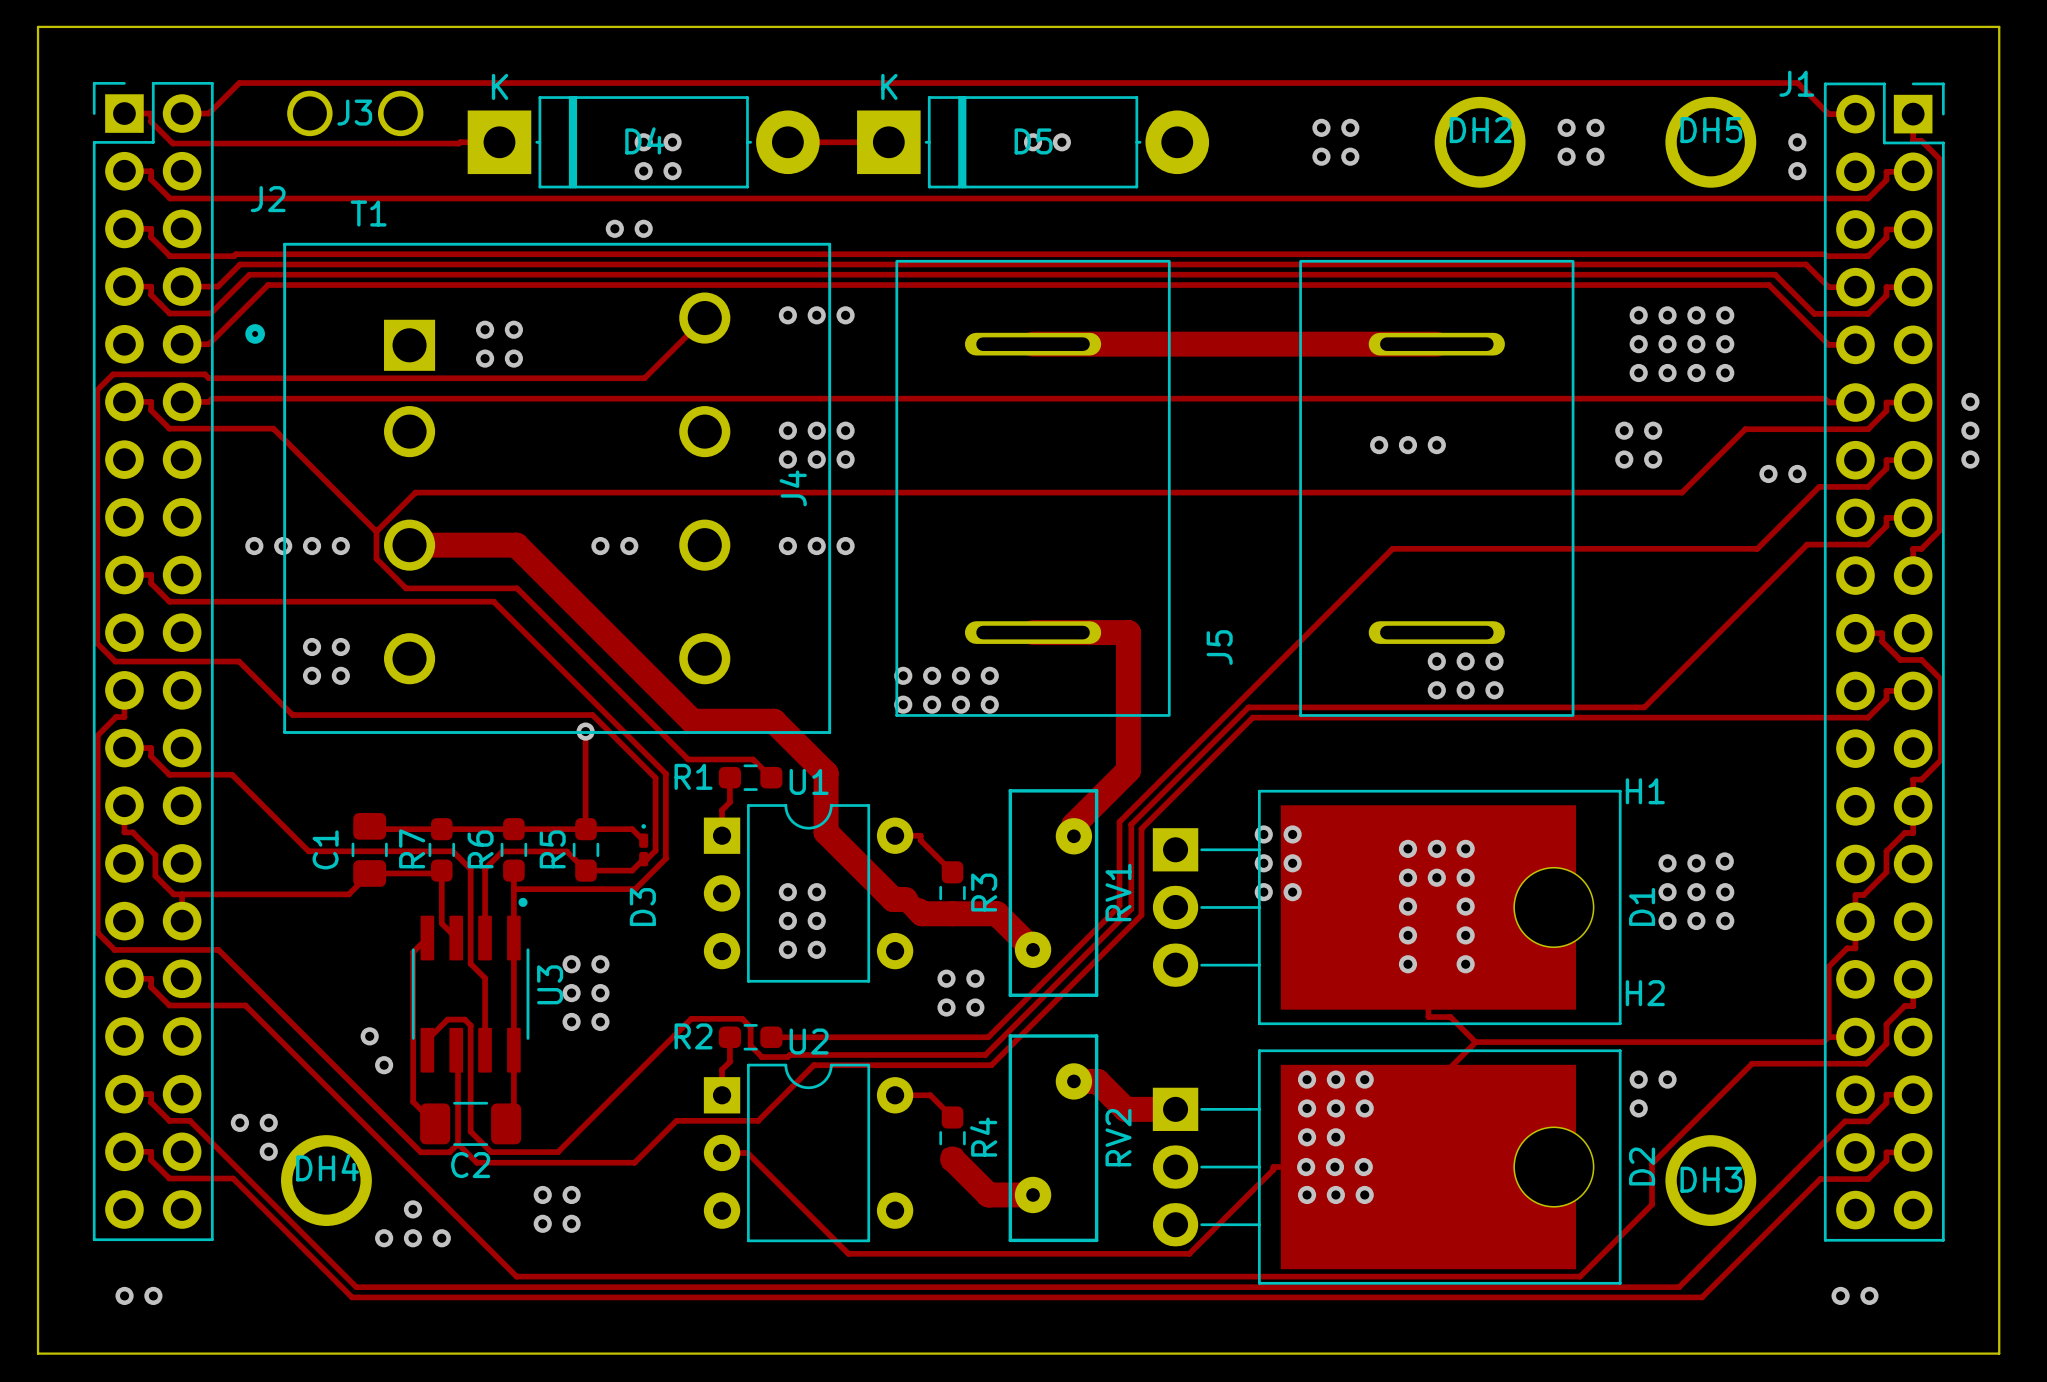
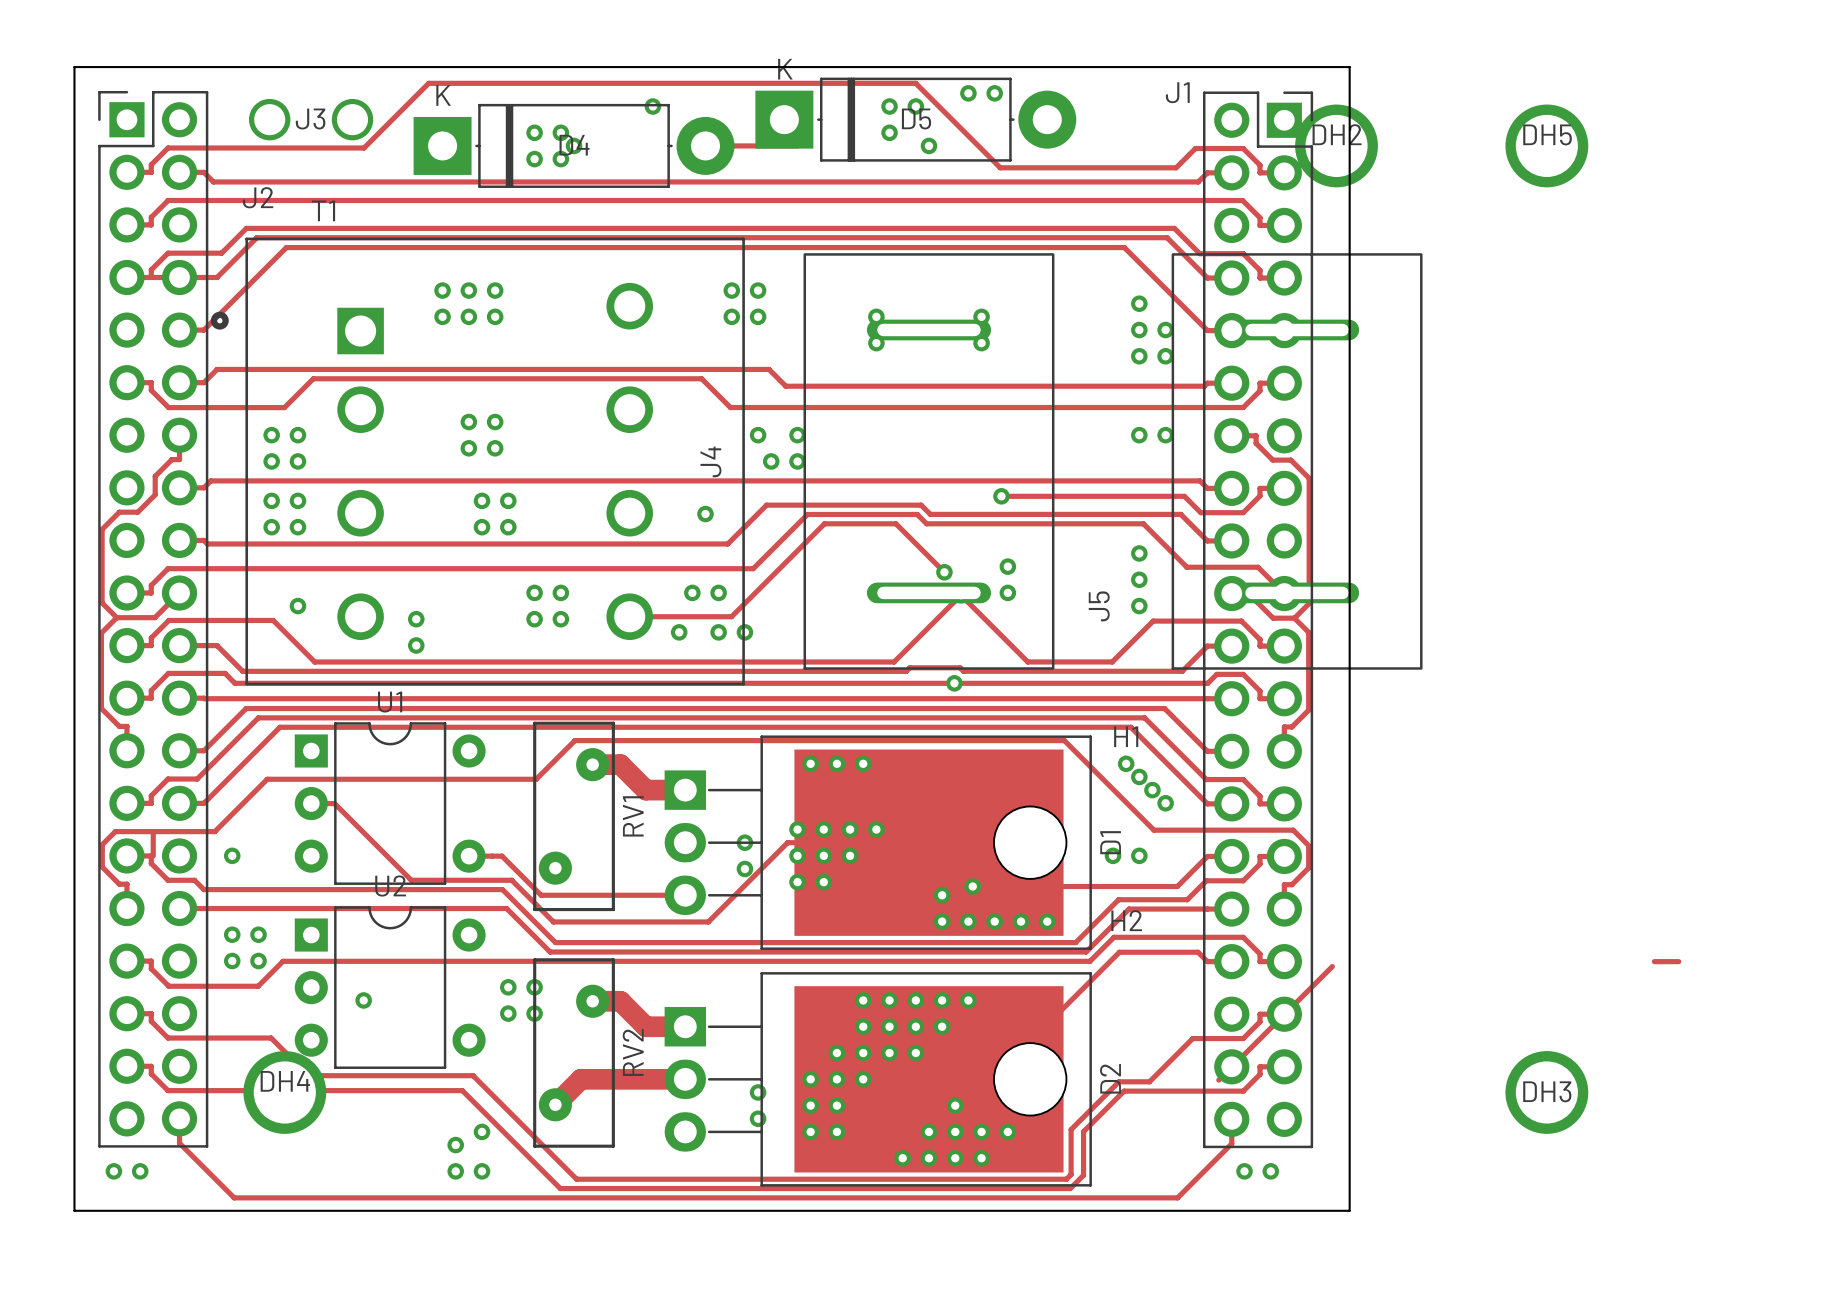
board edge: (38, 26) (38, 1353) (1999, 1353) (1999, 26) (38, 26) -> (74, 67) (74, 1210) (1349, 1210) (1349, 67) (74, 67)
via: none -> (968, 93)
via: none -> (994, 93)
via: none -> (652, 106)
via: none -> (889, 106)
via: none -> (915, 106)
track: (124, 113) (151, 113) (151, 121) (172, 143) (499, 142) -> none
track: (182, 113) (208, 113) (239, 83) (1797, 83) (1828, 114) (1855, 114) -> none
track: (1913, 114) (1913, 140) (1921, 140) (1939, 159) (1939, 530) (1921, 548) (1913, 548) (1913, 575) -> none
via: none -> (534, 132)
via: none -> (560, 132)
via: none -> (889, 132)
via: (1321, 127) -> none
via: (1350, 127) -> none
via: (1566, 127) -> none
via: (1595, 127) -> none
via: (672, 142) -> none
D5 position: (1033, 142) -> (915, 119)
via: (1061, 142) -> none
via: (1797, 142) -> none
via: none -> (534, 159)
via: (1321, 156) -> none
via: (1350, 156) -> none
via: (1566, 156) -> none
via: (1595, 156) -> none
track: (124, 171) (151, 171) (151, 179) (170, 198) (1868, 198) (1886, 180) (1886, 171) (1913, 171) -> none
track: none -> (126, 172) (151, 172) (151, 164) (168, 148) (364, 148) (428, 83) (915, 83) (1000, 167) (1176, 167) (1195, 148) (1243, 148) (1260, 165) (1260, 172) (1284, 172)
track: none -> (179, 172) (203, 172) (213, 181) (1198, 181) (1207, 172) (1231, 172)
via position: (643, 171) -> (560, 159)
via: (672, 171) -> none
via: (1797, 171) -> none
track: (124, 228) (151, 228) (151, 237) (170, 256) (233, 256) (235, 254) (1824, 254) (1826, 256) (1868, 256) (1886, 237) (1886, 229) (1913, 229) -> none
track: none -> (126, 224) (151, 224) (151, 217) (168, 200) (1242, 200) (1260, 217) (1260, 225) (1284, 225)
via: (614, 228) -> none
via: (643, 228) -> none
track: (124, 286) (151, 286) (151, 294) (169, 313) (210, 313) (249, 274) (1775, 274) (1814, 313) (1868, 313) (1886, 295) (1886, 287) (1913, 287) -> none
track: none -> (126, 277) (151, 277) (151, 269) (168, 253) (221, 253) (246, 228) (1174, 228) (1199, 253) (1243, 253) (1260, 270) (1260, 278) (1284, 278)
track: (217, 286) (240, 264) (1806, 264) (1828, 287) (1855, 287) -> (185, 277) (217, 277) (256, 237) (1167, 237) (1207, 278) (1231, 278)
via: none -> (442, 290)
via: none -> (468, 290)
via: none -> (495, 290)
via: none -> (731, 290)
via: none -> (758, 290)
via: (787, 315) -> none
via: (816, 315) -> none
via: (845, 315) -> none
via: none -> (1139, 303)
via: (1638, 315) -> none
via: (1667, 315) -> none
via: (1696, 315) -> none
via: (1725, 315) -> none
track: (704, 318) (644, 378) (208, 378) (204, 374) (112, 374) (97, 390) (97, 643) (115, 661) (239, 661) (292, 715) (592, 715) (655, 778) (655, 850) (647, 859) (643, 859) (632, 870) (586, 870) (566, 851) (502, 851) (485, 868) (485, 938) -> none
via: (485, 329) -> none
via: none -> (442, 316)
via: (513, 329) -> none
via: none -> (468, 316)
via: none -> (495, 316)
via: none -> (731, 316)
via: none -> (758, 316)
via: none -> (876, 316)
via: none -> (981, 316)
track: (182, 344) (208, 344) (268, 285) (1768, 285) (1828, 344) (1855, 344) -> none
track: none -> (179, 330) (203, 330) (286, 247) (1124, 247) (1207, 330) (1231, 330)
track: (1033, 344) (1436, 344) -> none
via: none -> (1139, 329)
via: none -> (1165, 329)
via: (1638, 344) -> none
via: (1667, 344) -> none
via: (1696, 344) -> none
via: (1725, 344) -> none
via: (485, 358) -> none
via: (513, 358) -> none
via: none -> (876, 343)
via: none -> (981, 343)
via: none -> (1139, 356)
via: none -> (1165, 356)
via: (1638, 373) -> none
via: (1667, 373) -> none
via: (1696, 373) -> none
via: (1725, 373) -> none
track: (124, 401) (151, 401) (151, 410) (169, 428) (273, 428) (376, 531) -> none
track: none -> (126, 382) (151, 382) (151, 390) (168, 407) (284, 407) (313, 378) (701, 378) (730, 407) (1243, 407) (1260, 390) (1260, 383) (1284, 383)
track: (182, 401) (208, 401) (212, 398) (1824, 398) (1828, 402) (1855, 402) -> none
track: none -> (179, 382) (203, 382) (217, 369) (769, 369) (785, 386) (1204, 386) (1207, 383) (1231, 383)
via: (1970, 401) -> none
track: (1913, 402) (1886, 402) (1886, 410) (1868, 429) (1745, 429) (1681, 492) (415, 492) (376, 531) -> none
via: (787, 430) -> none
via: (816, 430) -> none
via: (845, 430) -> none
via: (1624, 430) -> none
via: (1653, 430) -> none
via: (1970, 430) -> none
via: none -> (468, 422)
via: none -> (495, 422)
via: (1379, 445) -> none
via: (1407, 445) -> none
via: (1436, 445) -> none
track: none -> (179, 435) (179, 459) (171, 459) (155, 476) (155, 494) (137, 512) (119, 512) (102, 529) (102, 602) (116, 617)
via: none -> (271, 435)
via: none -> (297, 435)
via: (787, 459) -> none
via: (816, 459) -> none
via: none -> (797, 435)
via: none -> (1139, 435)
via: none -> (1165, 435)
via: (1624, 459) -> none
via: (1653, 459) -> none
via: (1970, 459) -> none
track: none -> (1231, 435) (1256, 435) (1256, 443) (1272, 460) (1290, 460) (1309, 478) (1309, 603) (1294, 618)
track: (1913, 460) (1886, 460) (1886, 468) (1868, 486) (1819, 486) (1757, 548) (1392, 548) (1119, 821) (1119, 905) (988, 1037) (771, 1037) -> none
via: none -> (468, 448)
via: none -> (495, 448)
via: (1768, 473) -> none
via: (1797, 473) -> none
via: none -> (271, 461)
via: none -> (297, 461)
via: none -> (771, 461)
via: none -> (797, 461)
track: none -> (179, 487) (203, 487) (210, 480) (1199, 480) (1207, 488) (1231, 488)
track: none -> (1284, 488) (1260, 488) (1260, 495) (1243, 512) (1200, 512) (1184, 496) (1001, 496)
track: (1913, 517) (1886, 517) (1886, 526) (1868, 544) (1807, 544) (1644, 707) (1248, 707) (1131, 824) (1131, 909) (985, 1054) (789, 1054) (787, 1057) (761, 1057) (750, 1045) (750, 1027) (742, 1018) (691, 1018) (557, 1152) (491, 1152) (470, 1131) (470, 1025) (464, 1019) (447, 1019) (427, 1039) (427, 1050) -> none
via: none -> (1001, 496)
via: none -> (271, 500)
via: none -> (297, 500)
track: (376, 531) (376, 558) (406, 588) (517, 588) (688, 759) (753, 759) (771, 777) -> none
via: none -> (482, 500)
via: none -> (508, 500)
track: (409, 545) (516, 545) (692, 721) (773, 721) (826, 773) (826, 832) (893, 899) (905, 899) (922, 913) (996, 913) (1033, 949) -> none
via: (254, 546) -> none
via: (283, 546) -> none
via: (312, 546) -> none
via: (340, 546) -> none
via: (600, 546) -> none
via: (629, 546) -> none
via: (816, 546) -> none
via: (845, 546) -> none
via: none -> (271, 527)
via: none -> (297, 527)
via: none -> (482, 527)
via: none -> (508, 527)
track: (124, 575) (151, 575) (151, 583) (169, 601) (493, 601) (665, 773) (665, 858) (635, 889) (513, 889) -> none
track: none -> (179, 540) (203, 540) (207, 543) (727, 543) (766, 505) (921, 505) (930, 514) (1180, 514) (1207, 540) (1231, 540)
via: none -> (1139, 553)
via: none -> (1007, 566)
track: none -> (944, 572) (895, 523) (824, 523) (731, 616) (629, 616)
via: none -> (944, 572)
via: none -> (1139, 579)
track: none -> (126, 593) (151, 593) (151, 585) (168, 568) (753, 568) (807, 514) (917, 514) (926, 523) (1143, 523) (1186, 567) (1258, 567) (1284, 593)
track: none -> (179, 593) (154, 617) (116, 617)
via: none -> (534, 592)
via: none -> (560, 592)
via: none -> (692, 592)
via: none -> (718, 592)
track: (1033, 632) (1128, 632) (1128, 770) (1073, 824) (1073, 836) -> none
via: none -> (1007, 592)
track: none -> (1231, 593) (1256, 593) (1256, 601) (1273, 618) (1294, 618)
track: (1855, 633) (1882, 633) (1882, 641) (1900, 659) (1921, 659) (1940, 679) (1940, 760) (1921, 779) (1913, 779) (1913, 832) (1904, 832) (1886, 851) (1886, 872) (1863, 894) (1855, 894) (1855, 948) (1847, 948) (1828, 966) (1828, 1037) (1823, 1042) (1475, 1042) (1450, 1017) (1428, 1017) (1428, 907) -> none
via: (312, 647) -> none
via: none -> (1139, 606)
track: none -> (116, 617) (101, 633) (101, 708) (119, 726) (126, 726) (126, 750)
track: none -> (1294, 618) (1308, 632) (1308, 710) (1291, 726) (1284, 726) (1284, 751)
J2 position: (153, 661) -> (153, 619)
via: none -> (416, 619)
via: none -> (534, 619)
via: none -> (560, 619)
via: (1436, 661) -> none
via: (1465, 661) -> none
via: (1494, 661) -> none
J1 position: (1884, 662) -> (1258, 619)
via: (312, 675) -> none
via: (340, 675) -> none
via: none -> (679, 632)
via: none -> (718, 632)
via: none -> (744, 632)
via: (903, 675) -> none
via: (932, 675) -> none
via: (960, 675) -> none
via: (989, 675) -> none
track: (124, 690) (124, 717) (116, 717) (97, 735) (97, 932) (114, 949) (218, 949) (420, 1152) (449, 1152) (458, 1143) -> none
track: none -> (126, 645) (151, 645) (151, 638) (168, 620) (273, 620) (314, 662) (894, 662) (960, 595) (1027, 661) (1112, 661) (1153, 621) (1241, 621) (1260, 639) (1260, 646) (1284, 646)
track: none -> (179, 645) (217, 645) (242, 671) (906, 671) (909, 667) (960, 667) (963, 671) (1182, 671) (1207, 646) (1231, 646)
via: none -> (416, 645)
via: (1436, 690) -> none
via: (1465, 690) -> none
via: (1494, 690) -> none
track: (1913, 690) (1886, 690) (1886, 699) (1868, 717) (1252, 717) (1141, 828) (1141, 915) (991, 1065) (813, 1065) (758, 1120) (676, 1120) (634, 1162) (476, 1162) (458, 1143) -> none
via: (903, 704) -> none
via: (932, 704) -> none
via: (960, 704) -> none
via: (989, 704) -> none
track: (585, 731) (585, 829) -> none
via: (585, 731) -> none
via: none -> (954, 683)
track: (124, 748) (151, 748) (151, 756) (169, 774) (232, 774) (308, 851) (452, 851) (470, 869) (470, 963) (485, 978) (485, 1050) -> none
track: none -> (126, 698) (151, 698) (151, 690) (168, 673) (225, 673) (235, 683) (1207, 683) (1216, 674) (1243, 674) (1260, 691) (1260, 698) (1284, 698)
track: none -> (179, 698) (1231, 698)
track: (729, 777) (729, 802) (722, 810) (722, 835) -> none
R1: (750, 777) -> none
track: (124, 805) (124, 832) (132, 832) (155, 855) (155, 876) (173, 894) -> (126, 908) (126, 884) (119, 884) (102, 867) (102, 844) (115, 831) (145, 831)
track: none -> (179, 750) (203, 750) (246, 708) (1164, 708) (1207, 751) (1231, 751)
track: none -> (592, 764) (620, 764) (645, 790) (685, 790)
via: none -> (810, 763)
via: none -> (836, 763)
via: none -> (863, 763)
via: none -> (1126, 763)
track: (369, 826) (372, 829) (632, 829) (643, 840) -> none
via: (1292, 834) -> none
track: (895, 835) (920, 835) (920, 840) (952, 872) -> none
D3: (643, 845) -> none
via: none -> (1152, 790)
via: (1407, 848) -> none
via: (1436, 848) -> none
via: (1465, 848) -> none
C1: (369, 849) -> none
R7: (441, 849) -> none
R6: (513, 849) -> none
R5: (586, 849) -> none
via: (1724, 861) -> none
track: none -> (126, 803) (151, 803) (151, 795) (168, 779) (197, 779) (258, 717) (1144, 717) (1206, 779) (1243, 779) (1260, 796) (1260, 803) (1284, 803)
track: none -> (179, 803) (203, 803) (279, 727) (1130, 727) (1207, 803) (1231, 803)
track: none -> (311, 803) (334, 803) (411, 880) (511, 880) (553, 921) (708, 921) (787, 842) (928, 842) (972, 886) (1177, 886) (1207, 856) (1231, 856)
via: (1263, 863) -> none
via: (1667, 863) -> none
via: (1696, 863) -> none
track: (441, 870) (441, 923) (456, 938) -> none
track: (513, 870) (513, 1116) (506, 1123) -> none
track: (441, 873) (369, 873) (348, 894) (249, 894) -> (1284, 909) (1284, 884) (1291, 884) (1308, 867) (1308, 845) (1293, 830) (1153, 830) (1064, 740) (574, 740) (536, 779) (267, 779) (214, 831)
via: (1407, 877) -> none
via: (1436, 877) -> none
via: (1465, 877) -> none
via: (787, 892) -> none
via: (816, 892) -> none
via: none -> (797, 829)
via: none -> (823, 829)
via: none -> (850, 829)
via: none -> (876, 829)
via: (1263, 892) -> none
via: (1292, 892) -> none
via: (1667, 892) -> none
via: (1696, 892) -> none
via: (1725, 892) -> none
U1 position: (808, 893) -> (390, 803)
R3: (952, 893) -> none
RV1 position: (1053, 893) -> (574, 816)
via: none -> (744, 842)
via: (1407, 906) -> none
via: (1465, 906) -> none
D1 position: (1387, 907) -> (878, 842)
H1 position: (1428, 907) -> (928, 842)
via: none -> (232, 855)
via: (787, 920) -> none
via: (816, 920) -> none
via: none -> (797, 855)
via: none -> (823, 855)
via: none -> (850, 855)
via: none -> (1113, 855)
via: none -> (1139, 855)
via: (1667, 920) -> none
via: (1696, 920) -> none
via: (1725, 920) -> none
track: none -> (126, 855) (151, 855) (151, 863) (168, 880) (194, 880) (203, 889) (502, 889) (555, 942) (1075, 942) (1118, 899) (1187, 899) (1206, 880) (1243, 880) (1260, 864) (1260, 856) (1284, 856)
track: none -> (469, 856) (502, 856) (541, 895) (685, 895)
via: none -> (744, 868)
via: (1407, 935) -> none
via: (1465, 935) -> none
track: (427, 938) (413, 952) (413, 1101) (435, 1123) -> none
via: (787, 949) -> none
via: (816, 949) -> none
via: none -> (797, 882)
via: none -> (823, 882)
via: none -> (972, 886)
via: (571, 964) -> none
via: (600, 964) -> none
via: none -> (942, 895)
via: (1407, 964) -> none
via: (1465, 964) -> none
track: (124, 978) (151, 978) (151, 987) (169, 1005) (245, 1005) (516, 1276) (1580, 1276) (1652, 1204) (1652, 1163) (1752, 1063) (1866, 1063) (1886, 1043) (1886, 1024) (1904, 1006) (1913, 1006) (1913, 979) -> none
track: none -> (179, 908) (506, 908) (550, 952) (1086, 952) (1129, 909) (1231, 909)
via: (946, 978) -> none
via: (975, 978) -> none
U3: (470, 985) -> none
via: (571, 993) -> none
via: (600, 993) -> none
via: none -> (942, 921)
via: none -> (968, 921)
via: none -> (994, 921)
via: none -> (1021, 921)
via: none -> (1047, 921)
via: none -> (232, 934)
via: none -> (258, 934)
via: (946, 1007) -> none
via: (975, 1007) -> none
via: (571, 1021) -> none
via: (600, 1021) -> none
track: none -> (126, 961) (151, 961) (151, 968) (168, 986) (258, 986) (283, 961) (1089, 961) (1114, 937) (1243, 937) (1260, 954) (1260, 961) (1284, 961)
via: none -> (232, 961)
via: none -> (258, 961)
via: (369, 1036) -> none
track: (729, 1037) (729, 1061) (722, 1069) (722, 1095) -> none
R2: (750, 1037) -> none
track: none -> (1231, 961) (1207, 961) (1198, 952) (1119, 952) (1042, 1029) (978, 1029) (928, 1079)
track: (456, 1050) (458, 1052) (458, 1143) -> none
via: (384, 1065) -> none
via: none -> (508, 987)
via: none -> (534, 987)
via: none -> (363, 1000)
via: none -> (863, 1000)
via: none -> (889, 1000)
via: none -> (915, 1000)
via: none -> (942, 1000)
via: none -> (968, 1000)
via: (1307, 1079) -> none
via: (1335, 1079) -> none
via: (1364, 1079) -> none
via: (1638, 1079) -> none
via: (1667, 1079) -> none
track: none -> (592, 1001) (620, 1001) (645, 1026) (685, 1026)
track: (1073, 1081) (1097, 1081) (1125, 1109) (1175, 1109) -> none
track: (124, 1094) (151, 1094) (151, 1102) (169, 1120) (189, 1120) (356, 1287) (1679, 1287) (1844, 1121) (1868, 1121) (1886, 1103) (1886, 1094) (1913, 1094) -> none
track: none -> (126, 1013) (151, 1013) (151, 1021) (168, 1038) (271, 1038) (308, 1075) (473, 1075) (576, 1179) (1066, 1179) (1071, 1174) (1071, 1129) (1118, 1081) (1149, 1081) (1192, 1038) (1243, 1038) (1260, 1021) (1260, 1014) (1284, 1014)
via: none -> (508, 1013)
via: none -> (534, 1013)
track: (895, 1095) (930, 1095) (952, 1117) -> none
via: none -> (863, 1026)
via: none -> (889, 1026)
via: none -> (915, 1026)
via: none -> (942, 1026)
via: (1307, 1108) -> none
via: (1335, 1108) -> none
via: (1364, 1108) -> none
via: (1638, 1108) -> none
via: (239, 1122) -> none
via: (268, 1122) -> none
C2: (470, 1123) -> none
via: none -> (836, 1053)
via: none -> (863, 1053)
via: none -> (889, 1053)
via: none -> (915, 1053)
via: (1307, 1137) -> none
via: (1335, 1137) -> none
R4: (952, 1138) -> none
RV2 position: (1053, 1138) -> (574, 1053)
track: (124, 1151) (151, 1151) (151, 1160) (169, 1178) (198, 1178) -> (126, 1066) (151, 1066) (151, 1073) (168, 1090)
via: (268, 1151) -> none
track: (722, 1152) (747, 1152) (848, 1253) (1189, 1253) (1273, 1169) (1273, 1167) (1428, 1167) -> none
U2 position: (808, 1152) -> (390, 987)
track: (1913, 1152) (1886, 1152) (1886, 1160) (1868, 1179) (1820, 1179) (1701, 1297) (352, 1297) (233, 1178) -> (1284, 1066) (1260, 1066) (1260, 1074) (1243, 1091) (1124, 1091) (1083, 1131) (1083, 1175) (1070, 1188) (560, 1188) (462, 1090) (199, 1090)
track: (952, 1158) (988, 1194) (1033, 1194) -> none
track: none -> (685, 1079) (580, 1079) (555, 1104)
via: none -> (810, 1079)
via: none -> (836, 1079)
via: none -> (863, 1079)
via: (1306, 1167) -> none
via: (1334, 1167) -> none
via: (1363, 1167) -> none
D2 position: (1387, 1167) -> (878, 1079)
H2 position: (1428, 1167) -> (928, 1079)
via: none -> (758, 1092)
via: (542, 1194) -> none
via: (571, 1194) -> none
via: none -> (810, 1105)
via: none -> (836, 1105)
via: none -> (955, 1105)
via: (1307, 1194) -> none
via: (1335, 1194) -> none
via: (1364, 1194) -> none
track: none -> (179, 1118) (179, 1143) (234, 1197) (1177, 1197) (1231, 1143) (1231, 1119)
via: (412, 1209) -> none
via: none -> (758, 1118)
via: (571, 1223) -> none
via: none -> (810, 1131)
via: none -> (836, 1131)
via: none -> (928, 1131)
via: none -> (955, 1131)
via: none -> (981, 1131)
via: none -> (1007, 1131)
via: (384, 1238) -> none
via: (412, 1238) -> none
via: (441, 1238) -> none
via: none -> (455, 1145)
via: none -> (902, 1158)
via: none -> (928, 1158)
via: none -> (955, 1158)
via: none -> (981, 1158)
via: none -> (113, 1171)
via: none -> (140, 1171)
via: none -> (455, 1171)
via: none -> (482, 1171)
via: none -> (1244, 1171)
via: none -> (1270, 1171)
via: (124, 1295) -> none
via: (153, 1295) -> none
via: (1840, 1295) -> none
via: (1869, 1295) -> none

